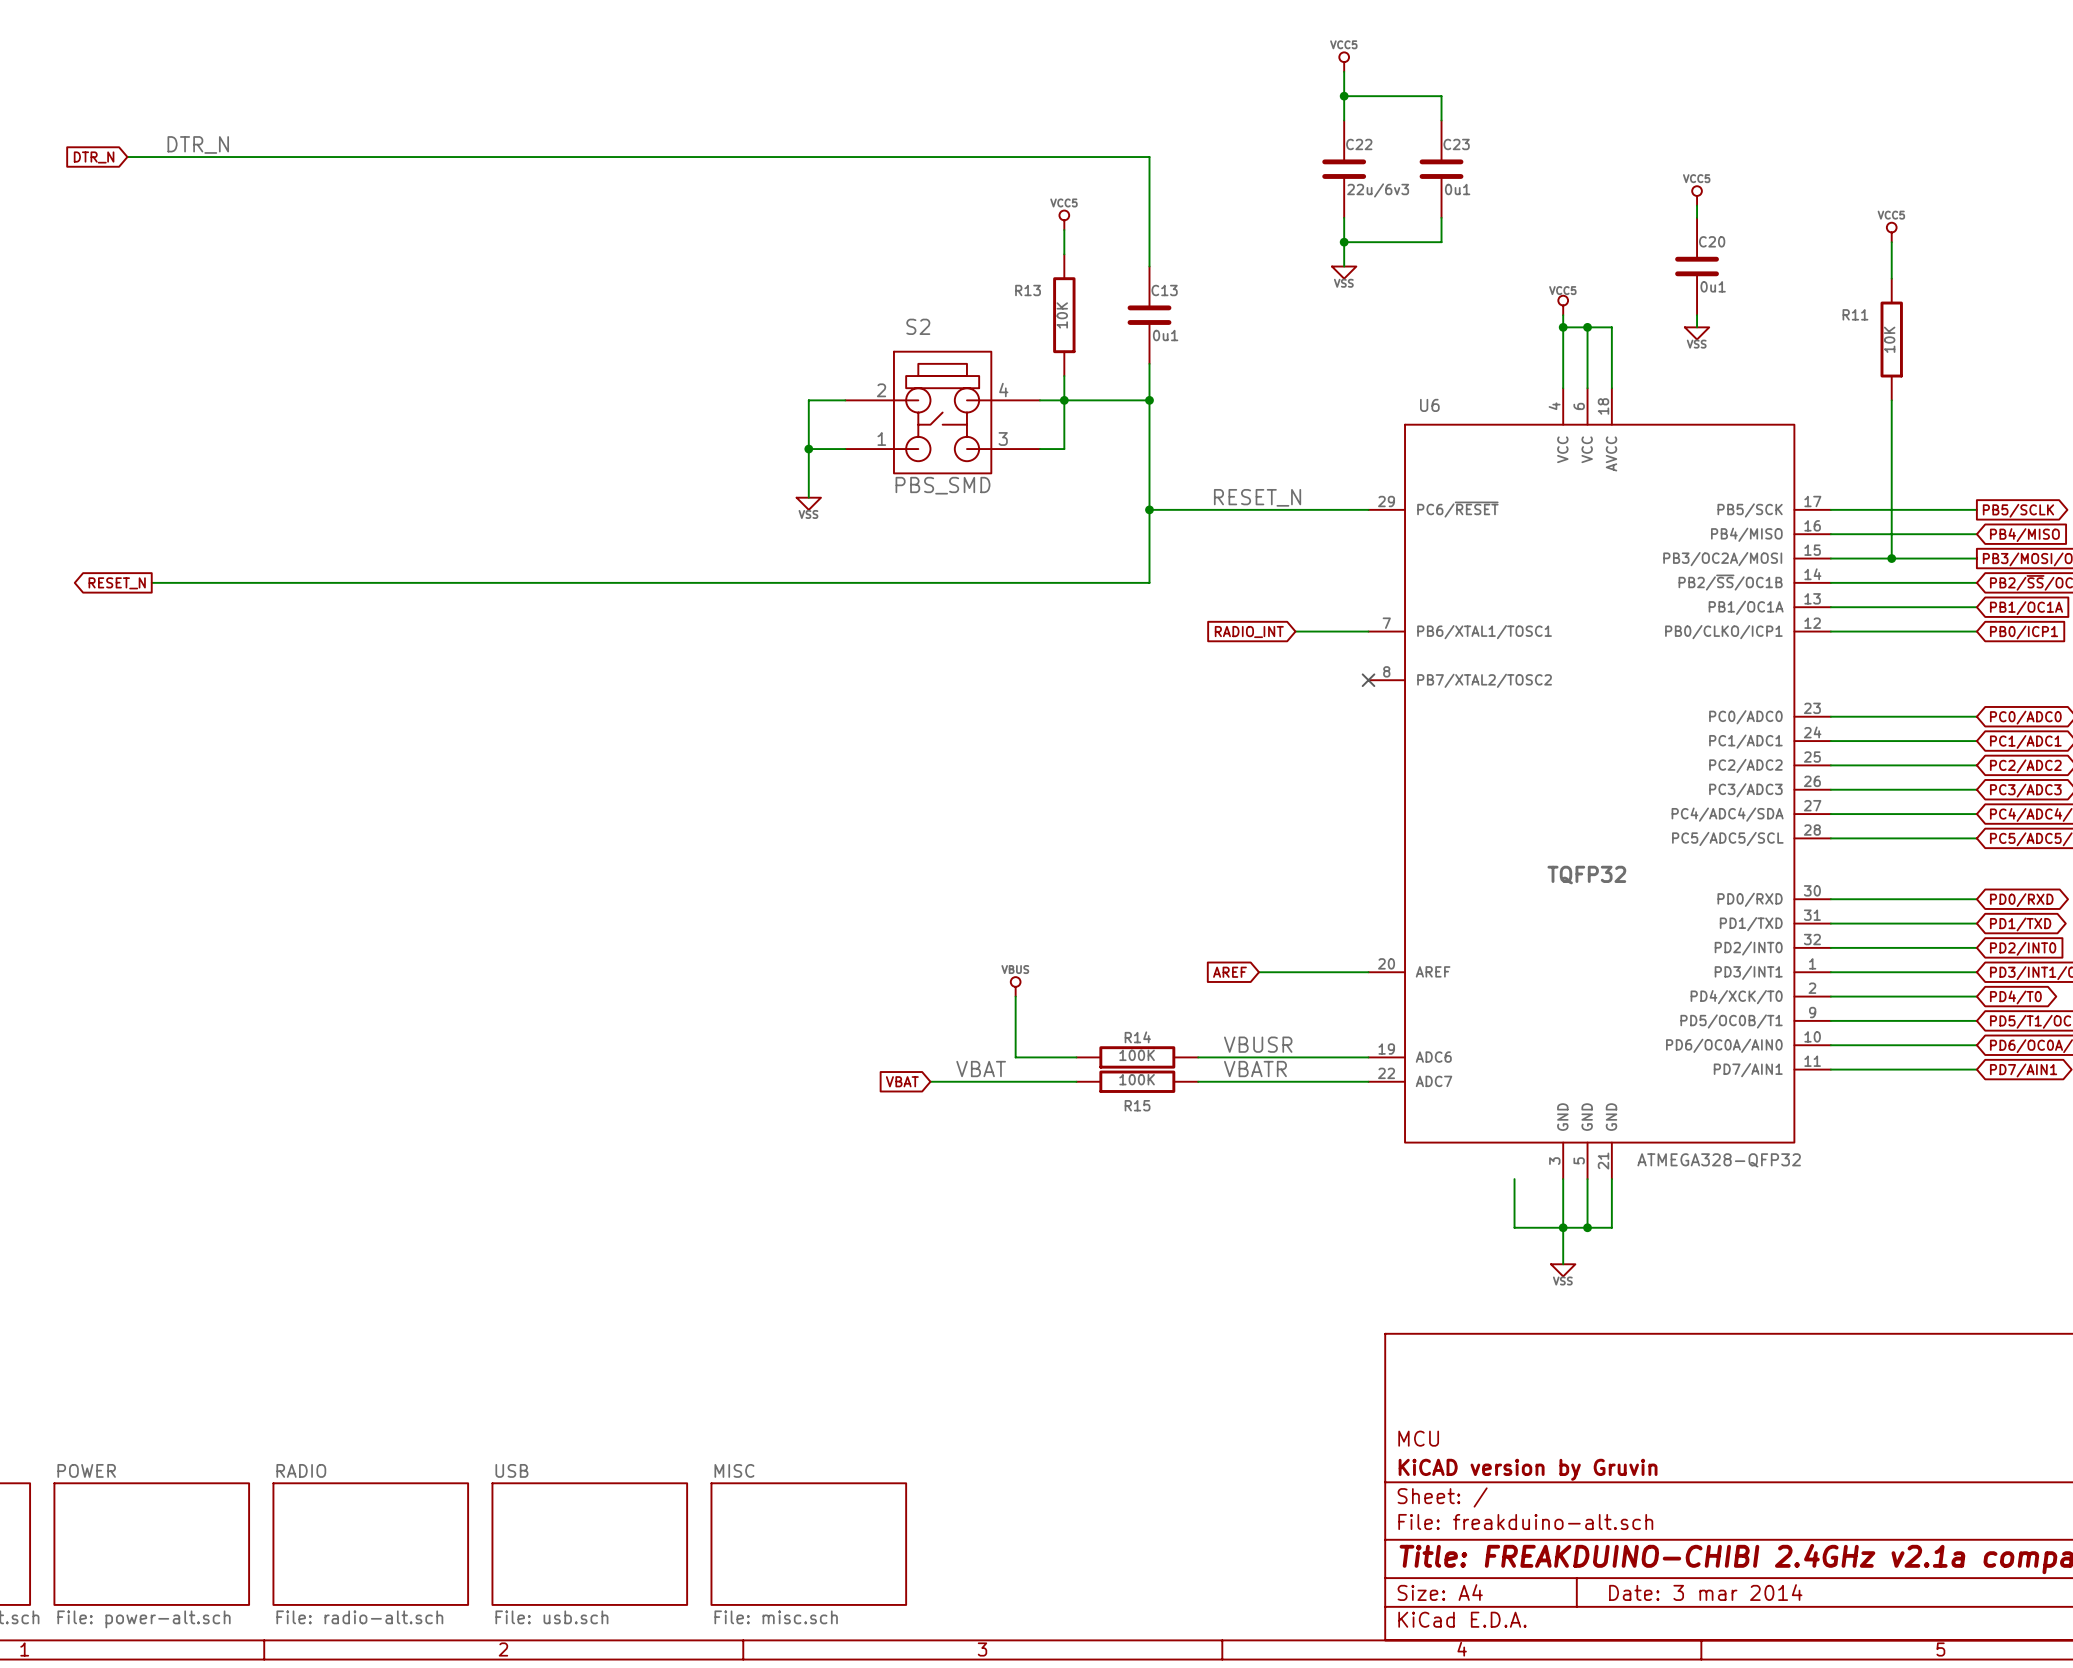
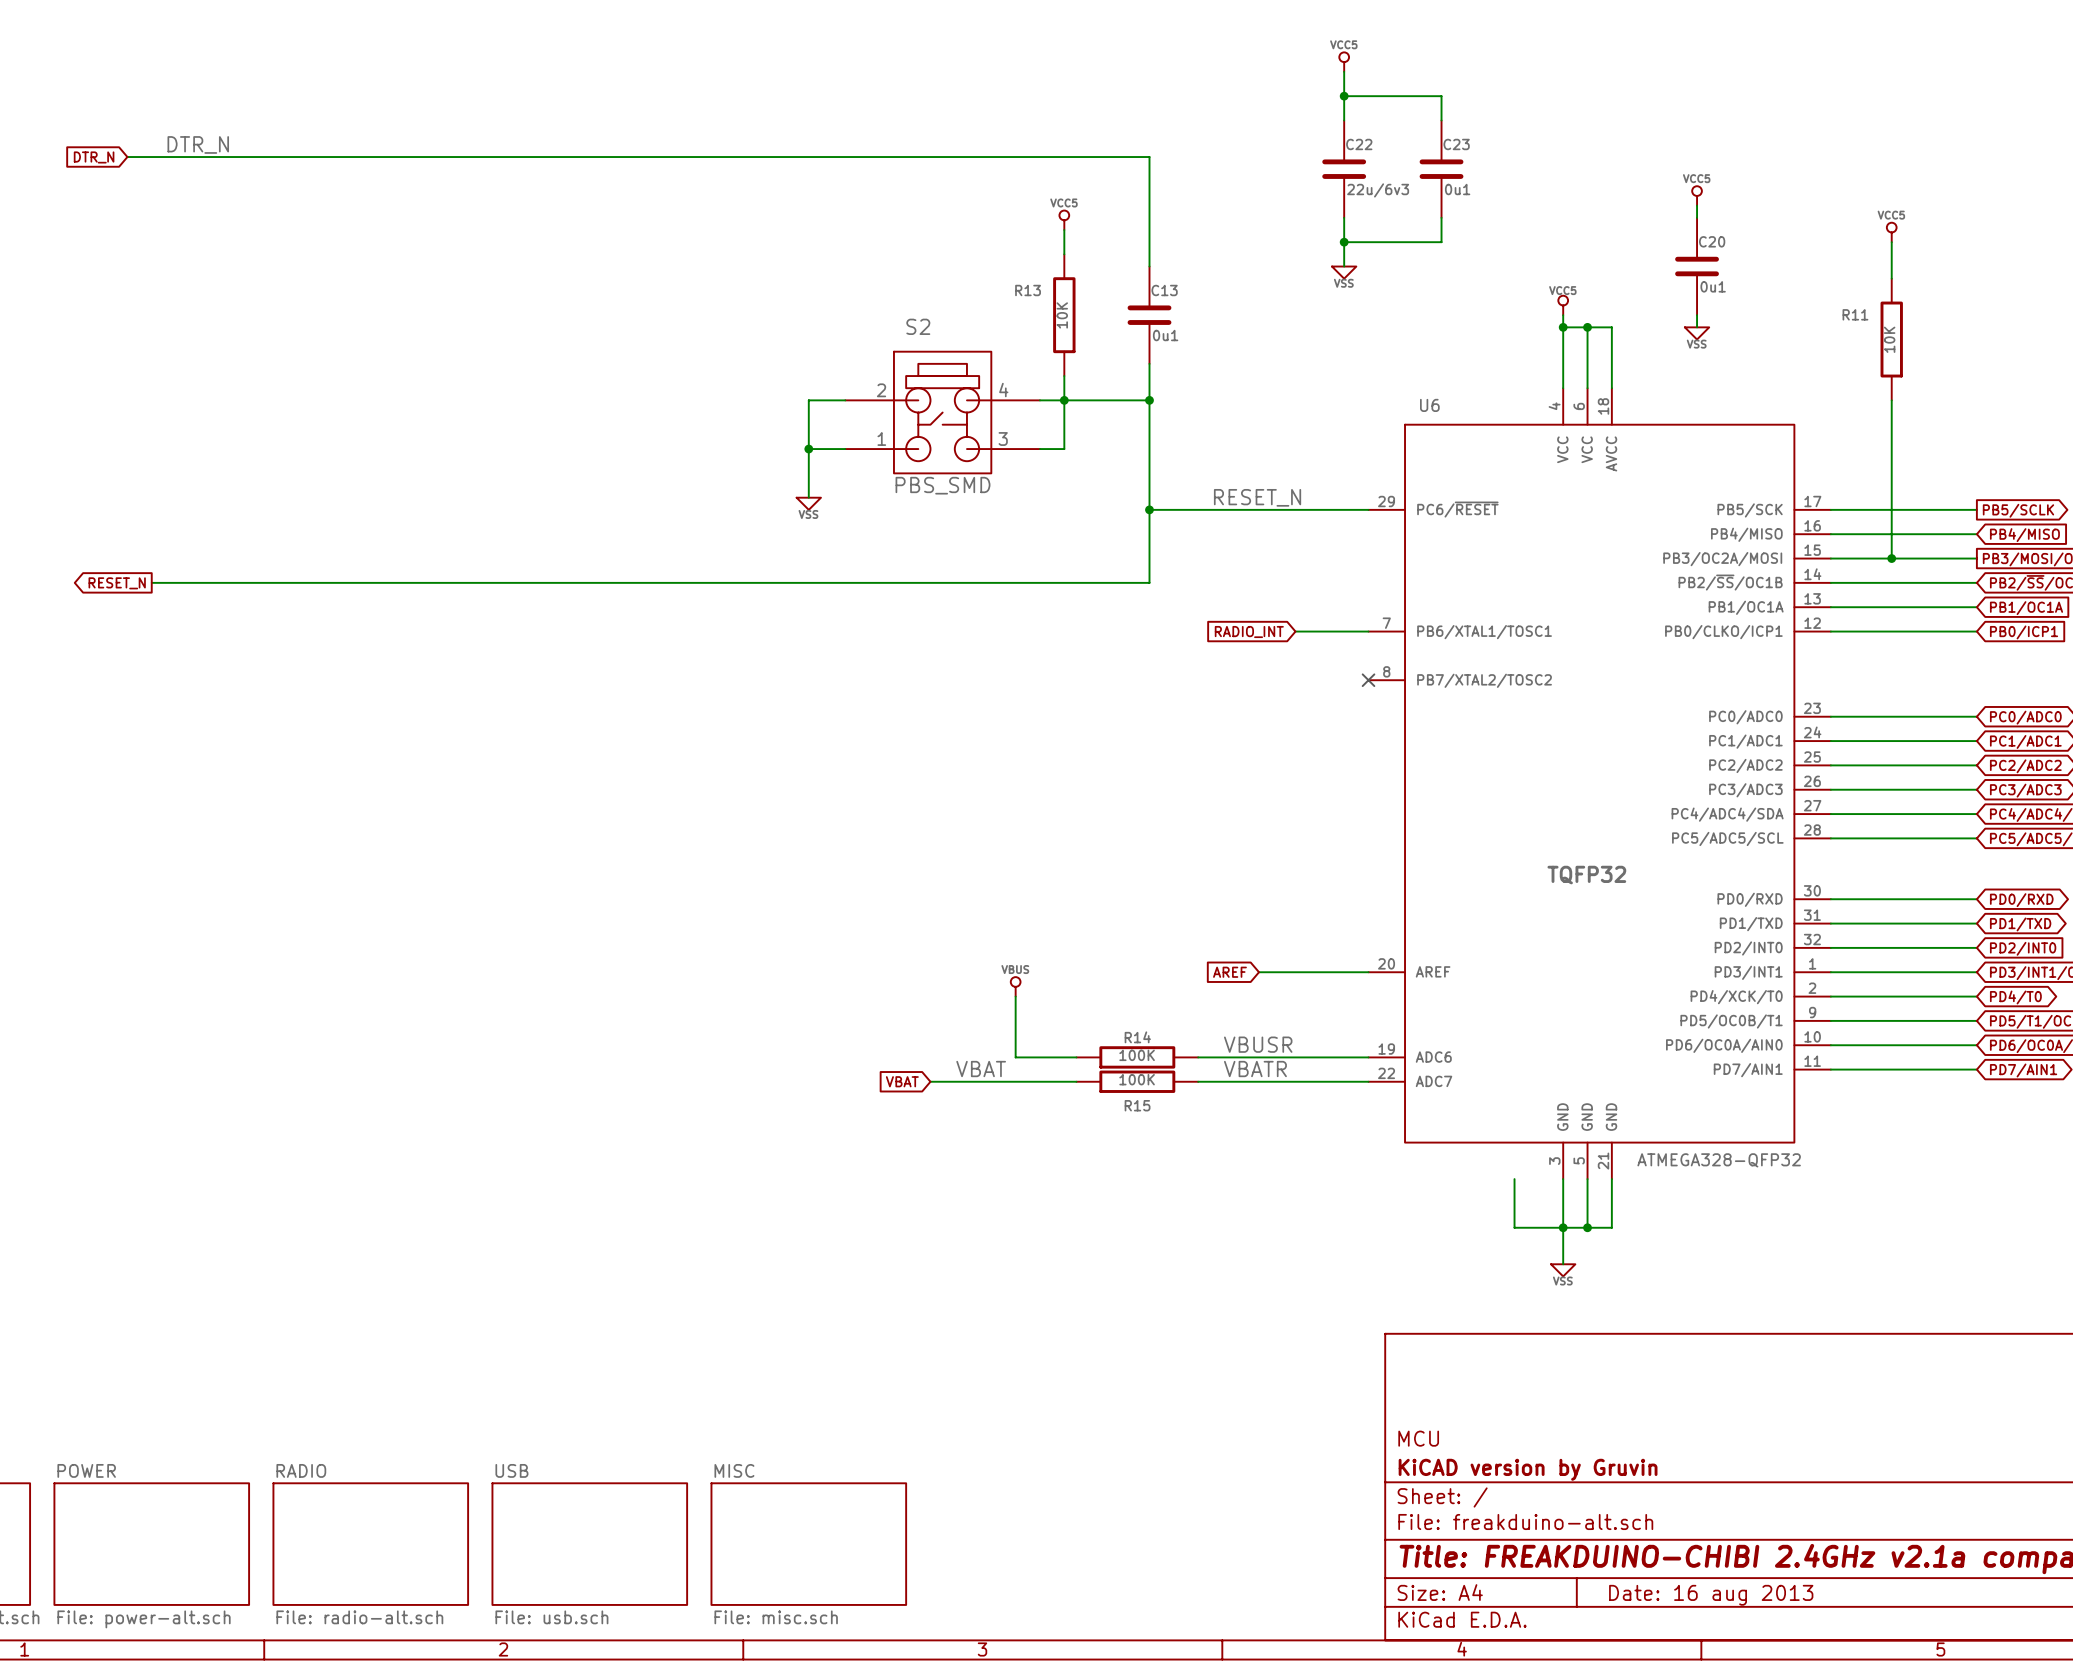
title block: Date: 3 mar 2014 (1705, 1592) -> Date: 16 aug 2013 (1711, 1595)

